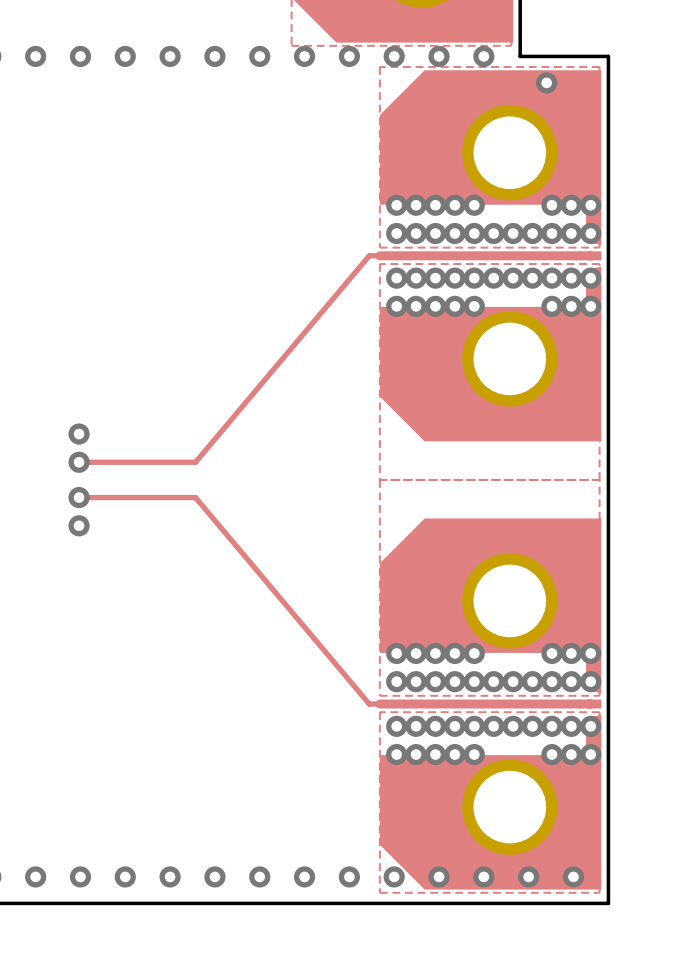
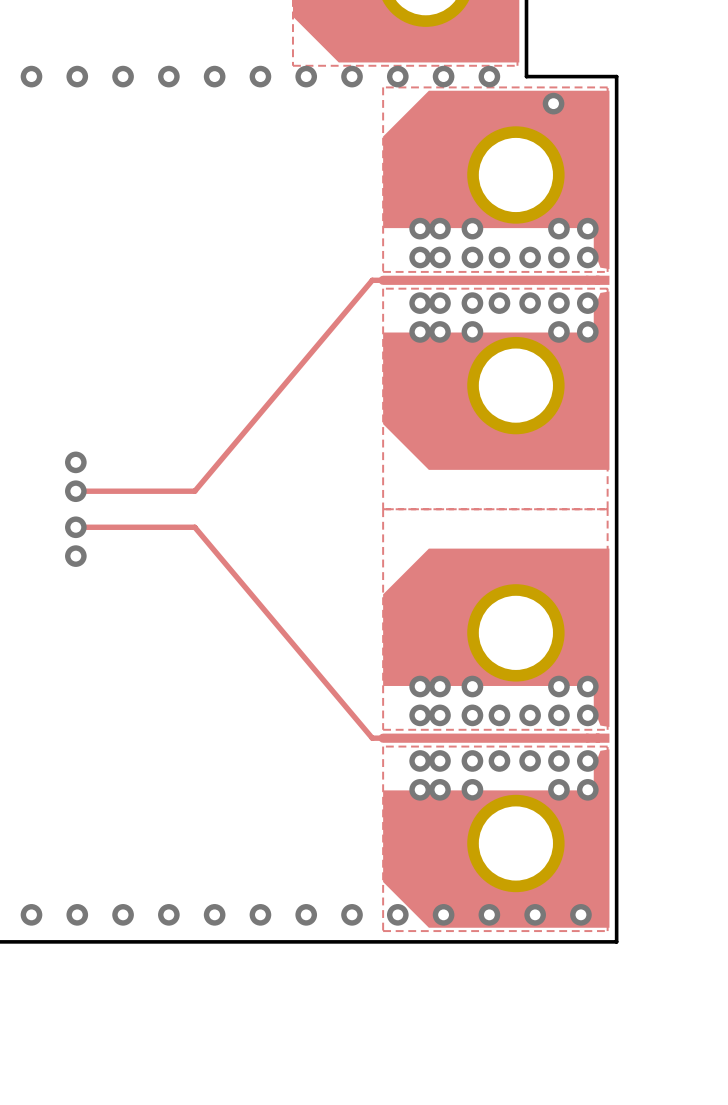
via: (396, 205) -> none
via: (454, 205) -> none
via: none -> (472, 228)
via: (474, 205) -> none
via: (571, 205) -> none
via: none -> (587, 228)
via: (590, 205) -> none
via: (396, 233) -> none
via: (454, 233) -> none
via: none -> (472, 257)
via: (474, 233) -> none
via: (513, 233) -> none
via: none -> (530, 257)
via: (532, 233) -> none
via: (571, 233) -> none
via: none -> (587, 257)
via: (590, 233) -> none
via: (396, 278) -> none
via: (454, 278) -> none
via: none -> (472, 303)
via: (474, 278) -> none
via: (513, 278) -> none
via: none -> (530, 303)
via: (532, 278) -> none
via: (571, 278) -> none
via: none -> (587, 303)
via: (590, 278) -> none
via: (396, 306) -> none
via: (454, 306) -> none
via: none -> (472, 331)
via: (474, 306) -> none
via: (571, 306) -> none
via: none -> (587, 331)
via: (590, 306) -> none
via: (396, 653) -> none
via: (454, 653) -> none
via: none -> (472, 686)
via: (474, 653) -> none
via: (571, 653) -> none
via: none -> (587, 686)
via: (590, 653) -> none
via: (396, 681) -> none
via: (454, 681) -> none
via: none -> (472, 715)
via: (474, 681) -> none
via: (513, 681) -> none
via: none -> (530, 715)
via: (532, 681) -> none
via: (571, 681) -> none
via: none -> (587, 715)
via: (590, 681) -> none
via: (396, 726) -> none
via: (454, 726) -> none
via: none -> (472, 760)
via: (474, 726) -> none
via: (513, 726) -> none
via: none -> (530, 760)
via: (532, 726) -> none
via: (571, 726) -> none
via: none -> (587, 760)
via: (590, 726) -> none
via: (396, 754) -> none
via: (454, 754) -> none
via: none -> (472, 789)
via: (474, 754) -> none
via: (571, 754) -> none
via: none -> (587, 789)
via: (590, 754) -> none

